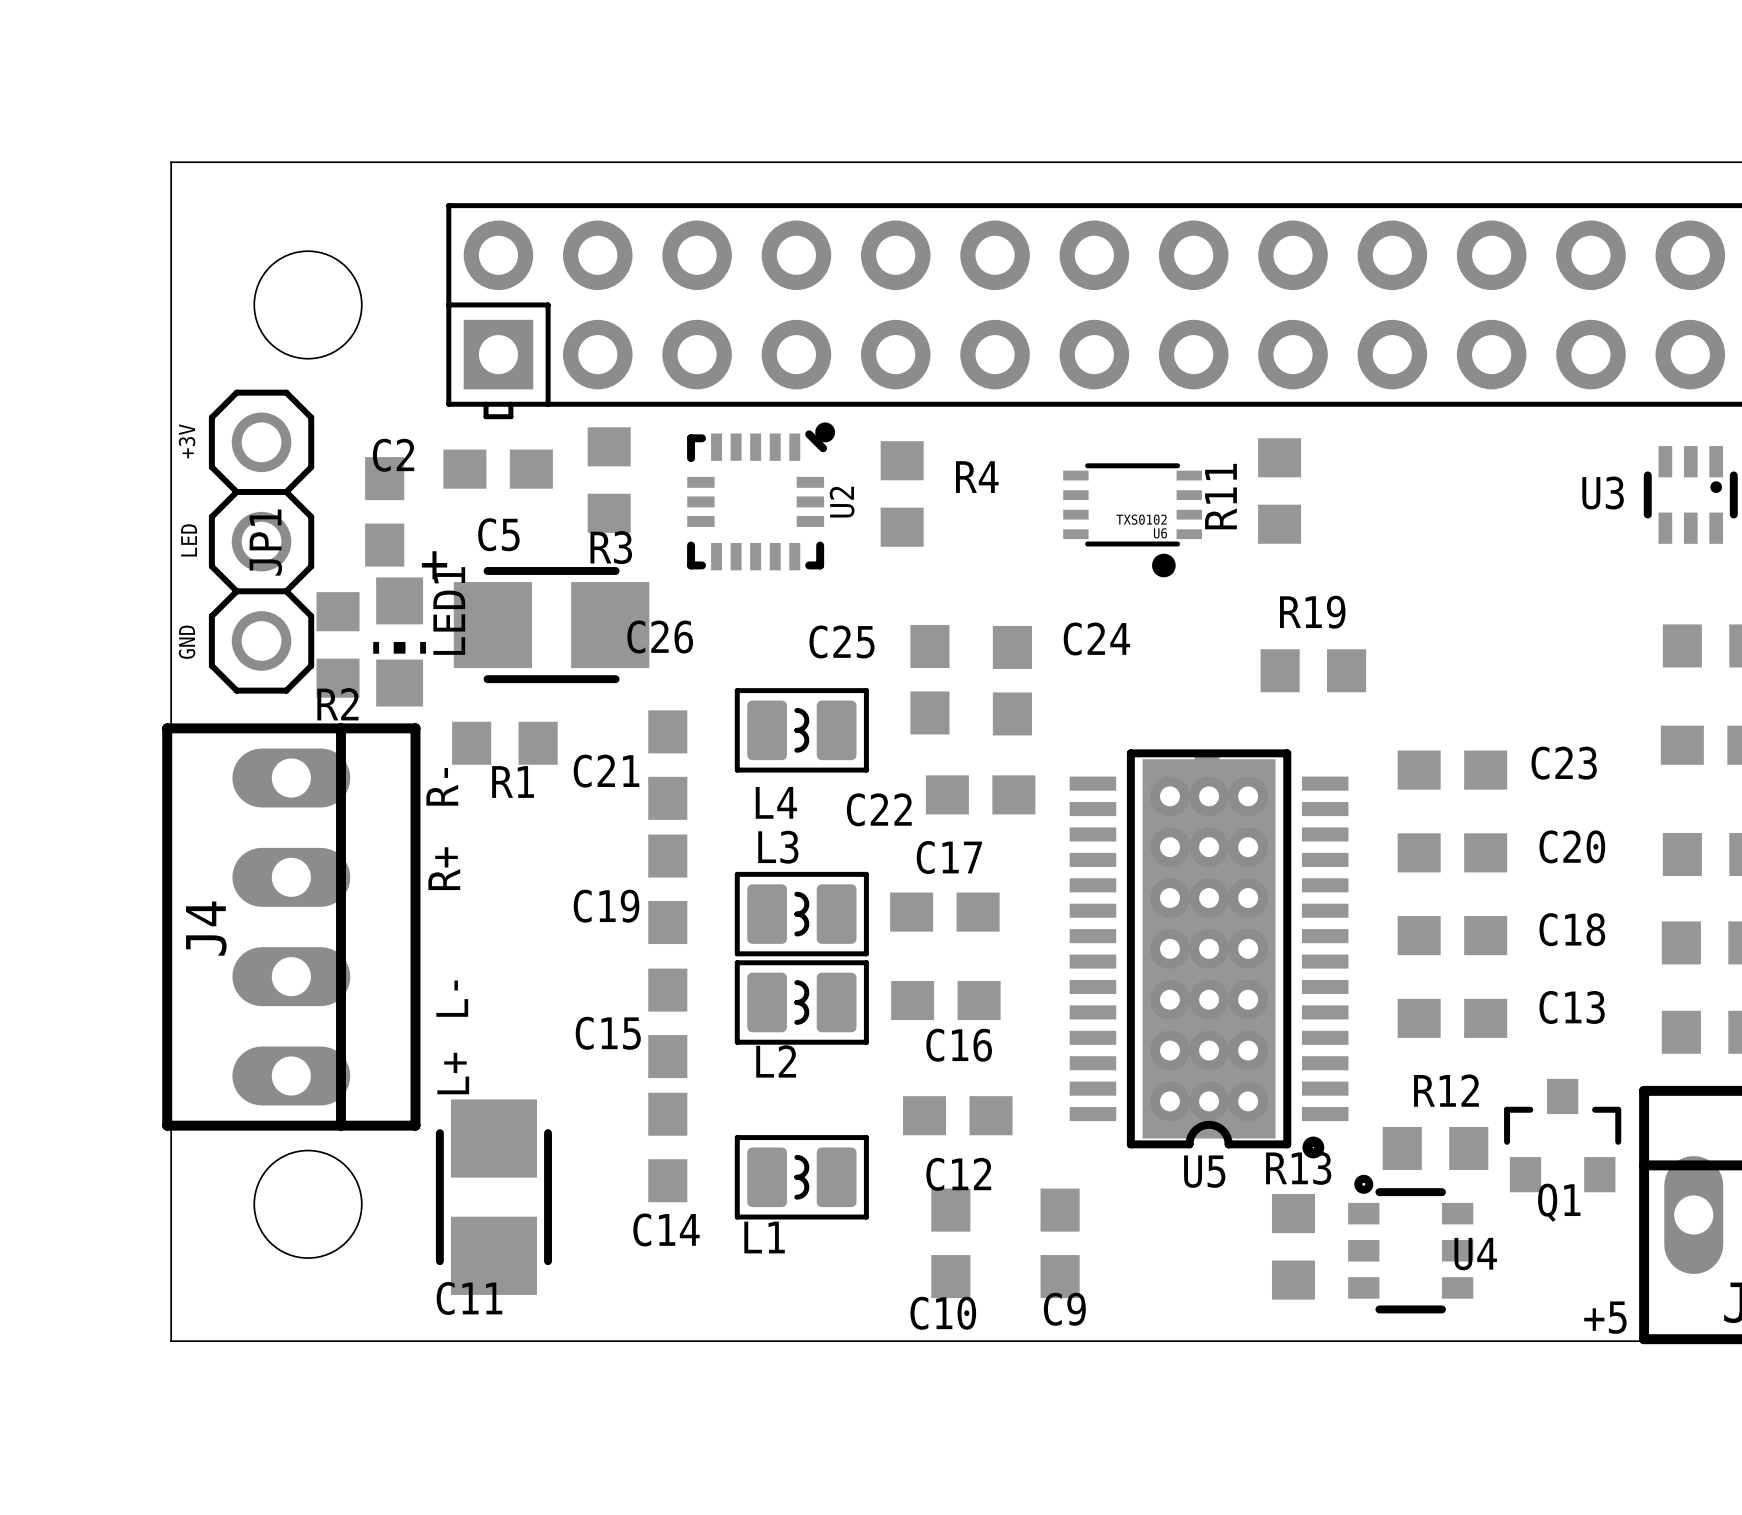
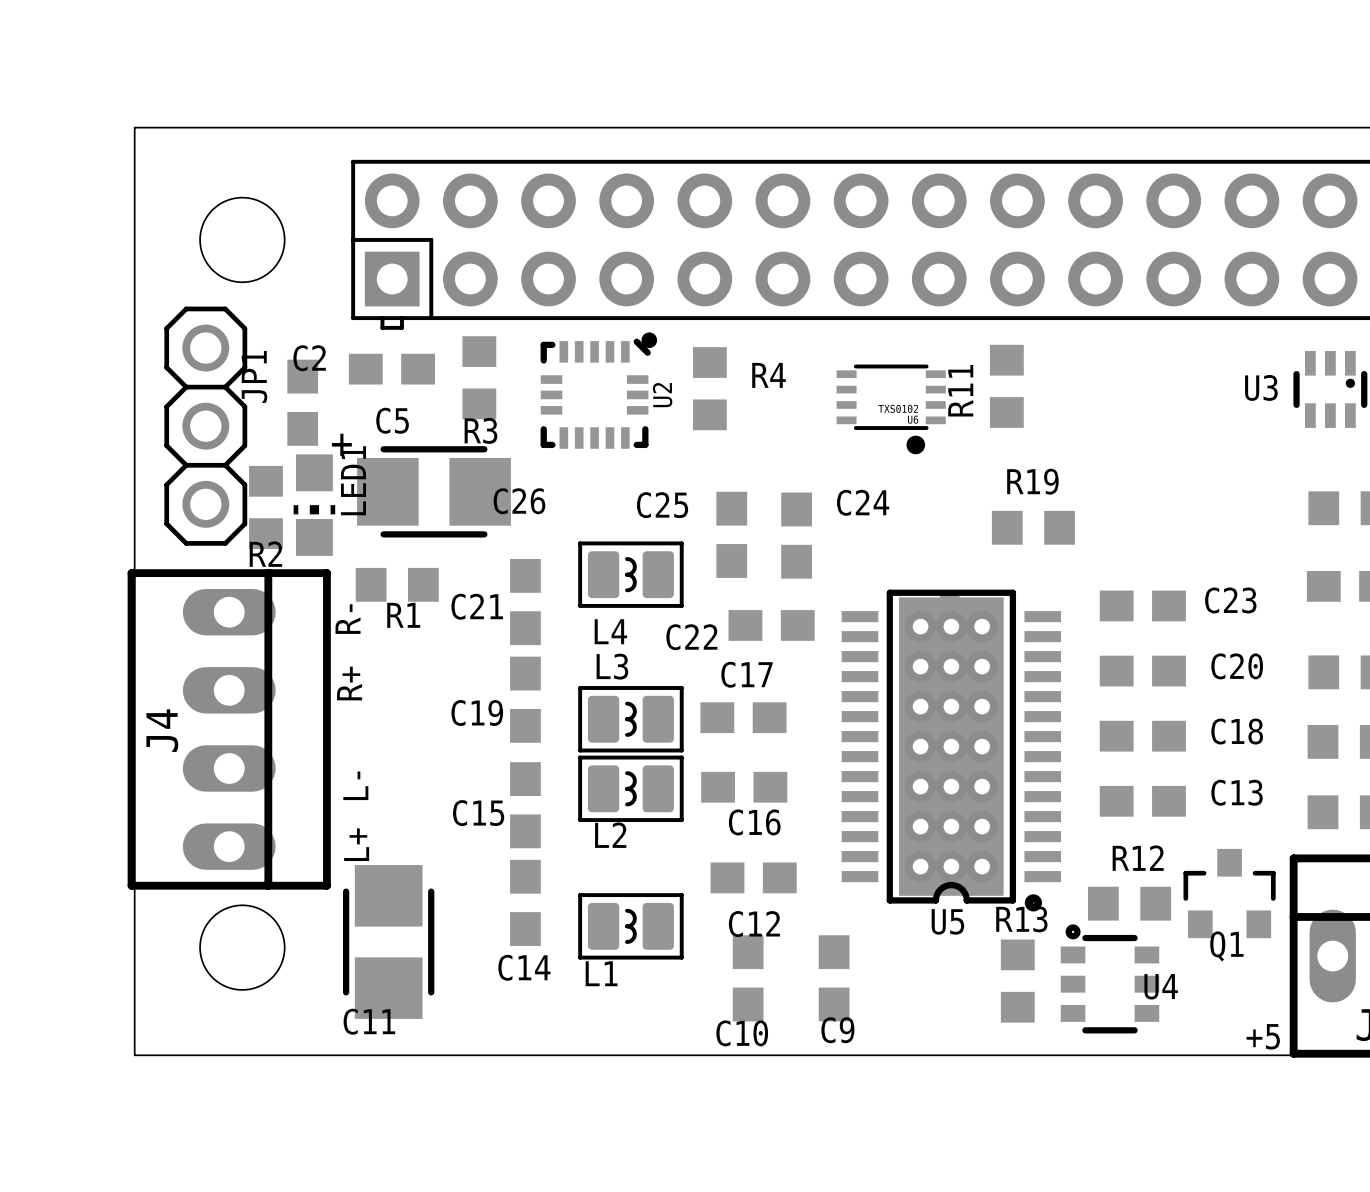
text: +3V (187, 441) -> none
text: LED (189, 540) -> none
JP1 name position: JP1 (265, 542) -> JP1 (254, 376)
text: GND (187, 642) -> none

